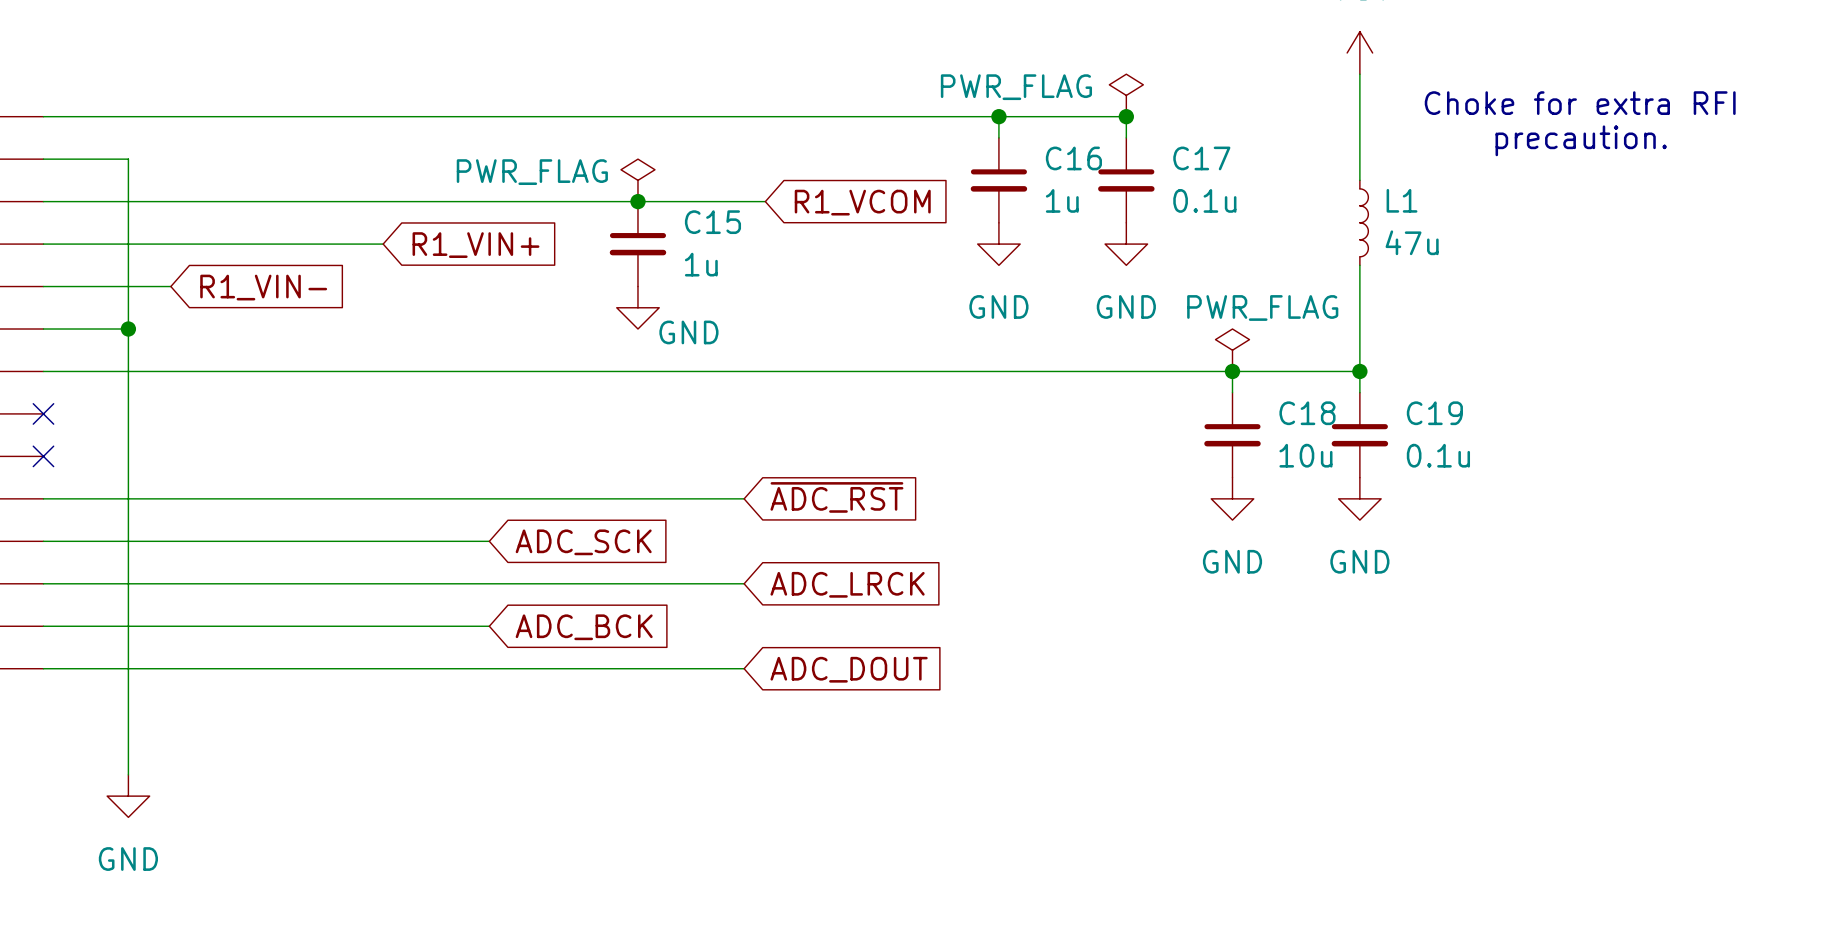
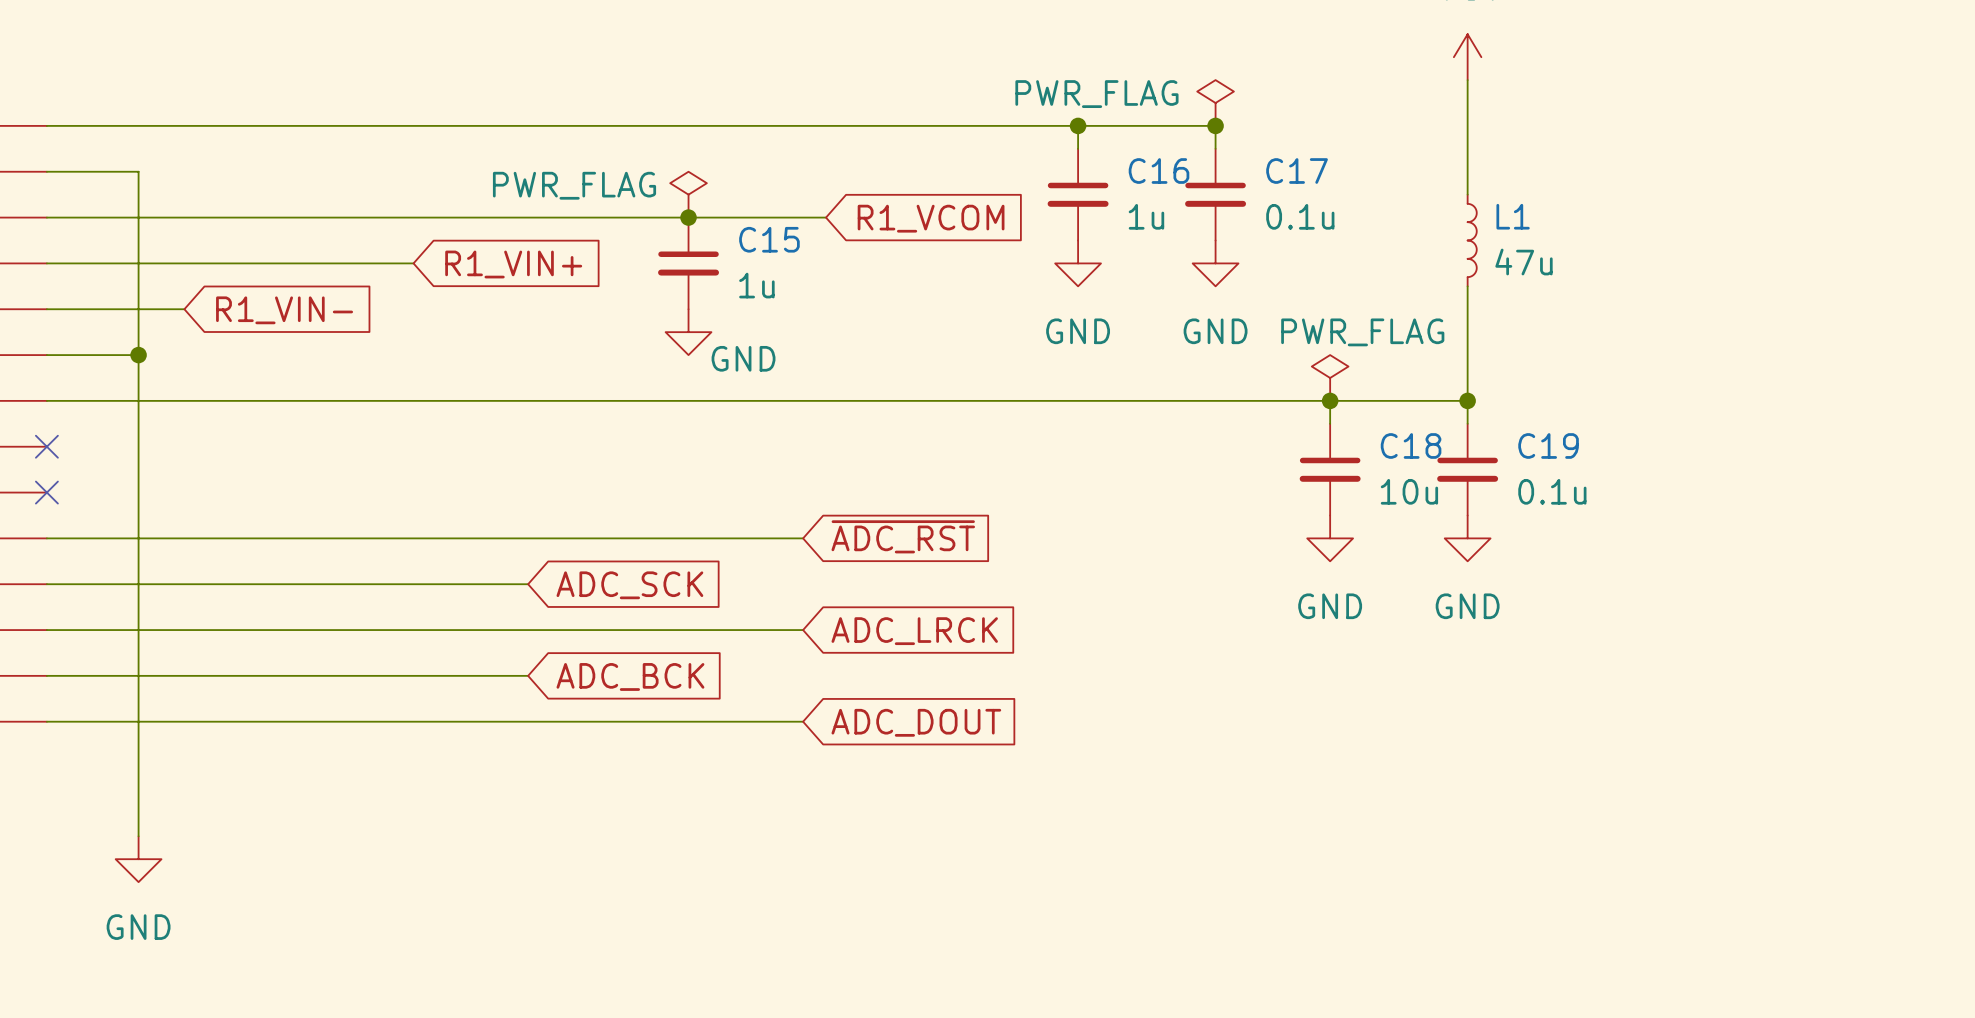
text: Choke for extra RFI (1580, 103) -> none
text: precaution. (1581, 140) -> none

